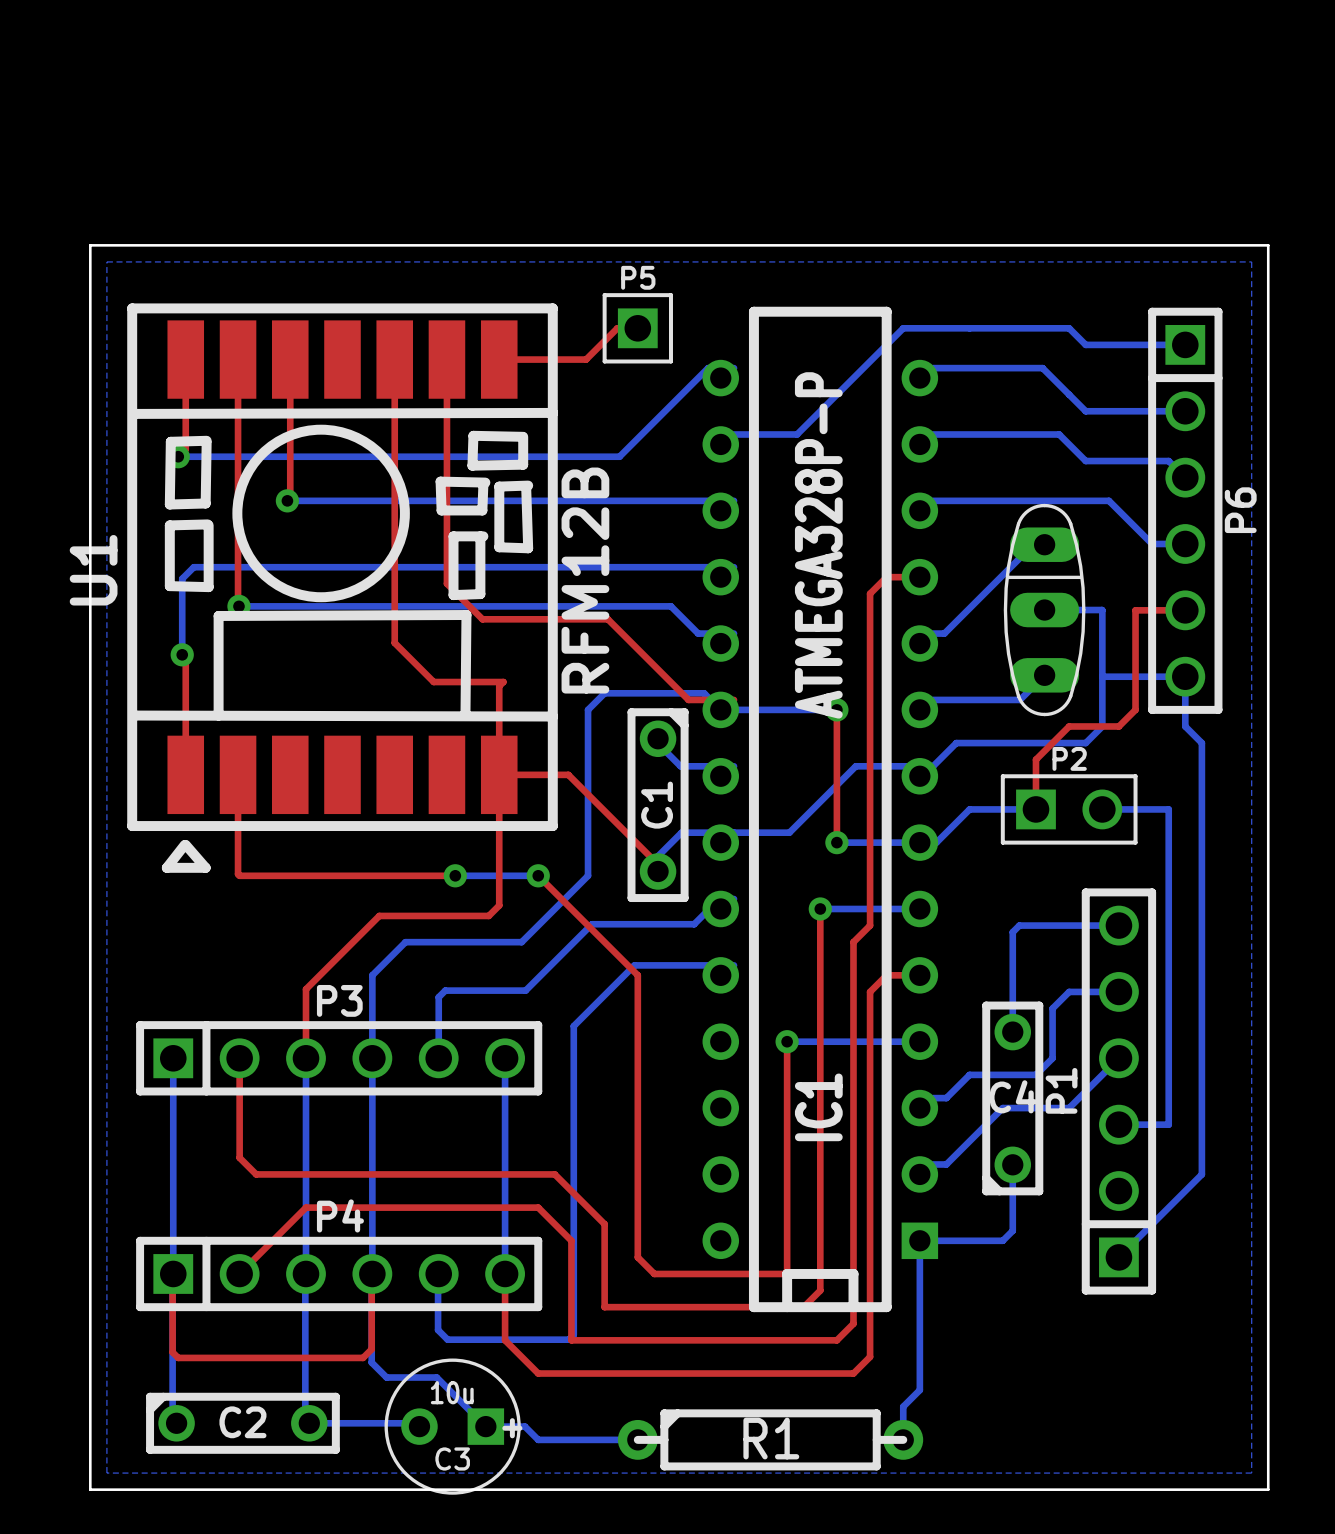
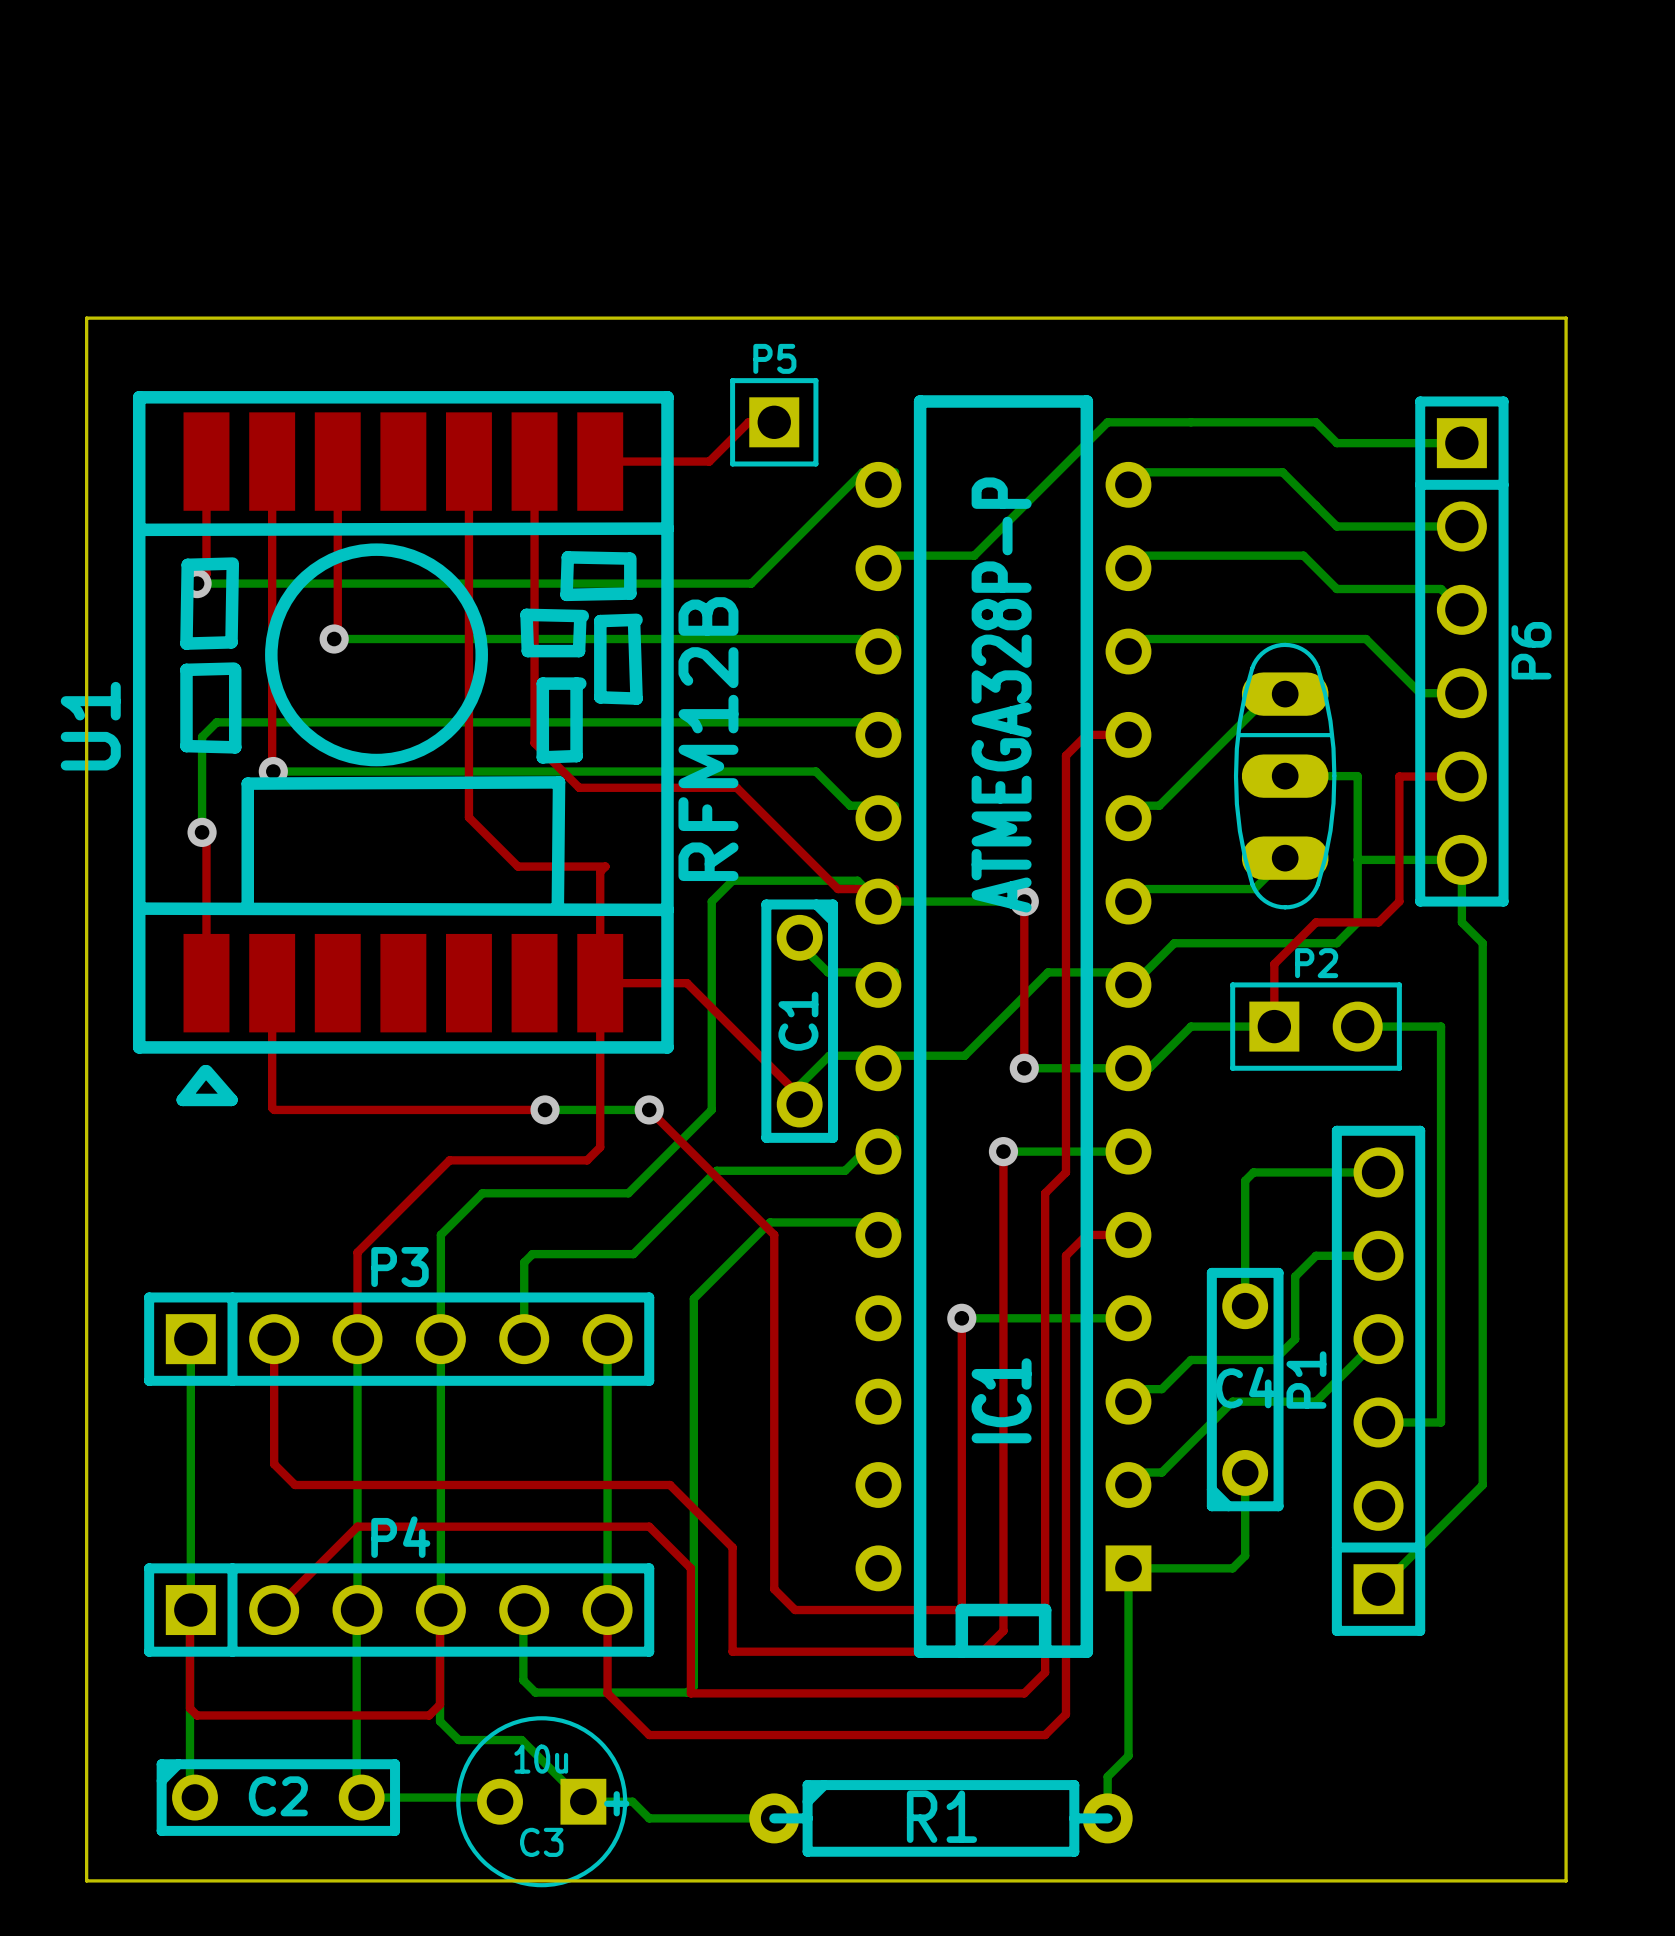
bottom zone outline: (106, 261) (106, 1473) (1251, 1473) (1251, 261) (106, 261) -> none

